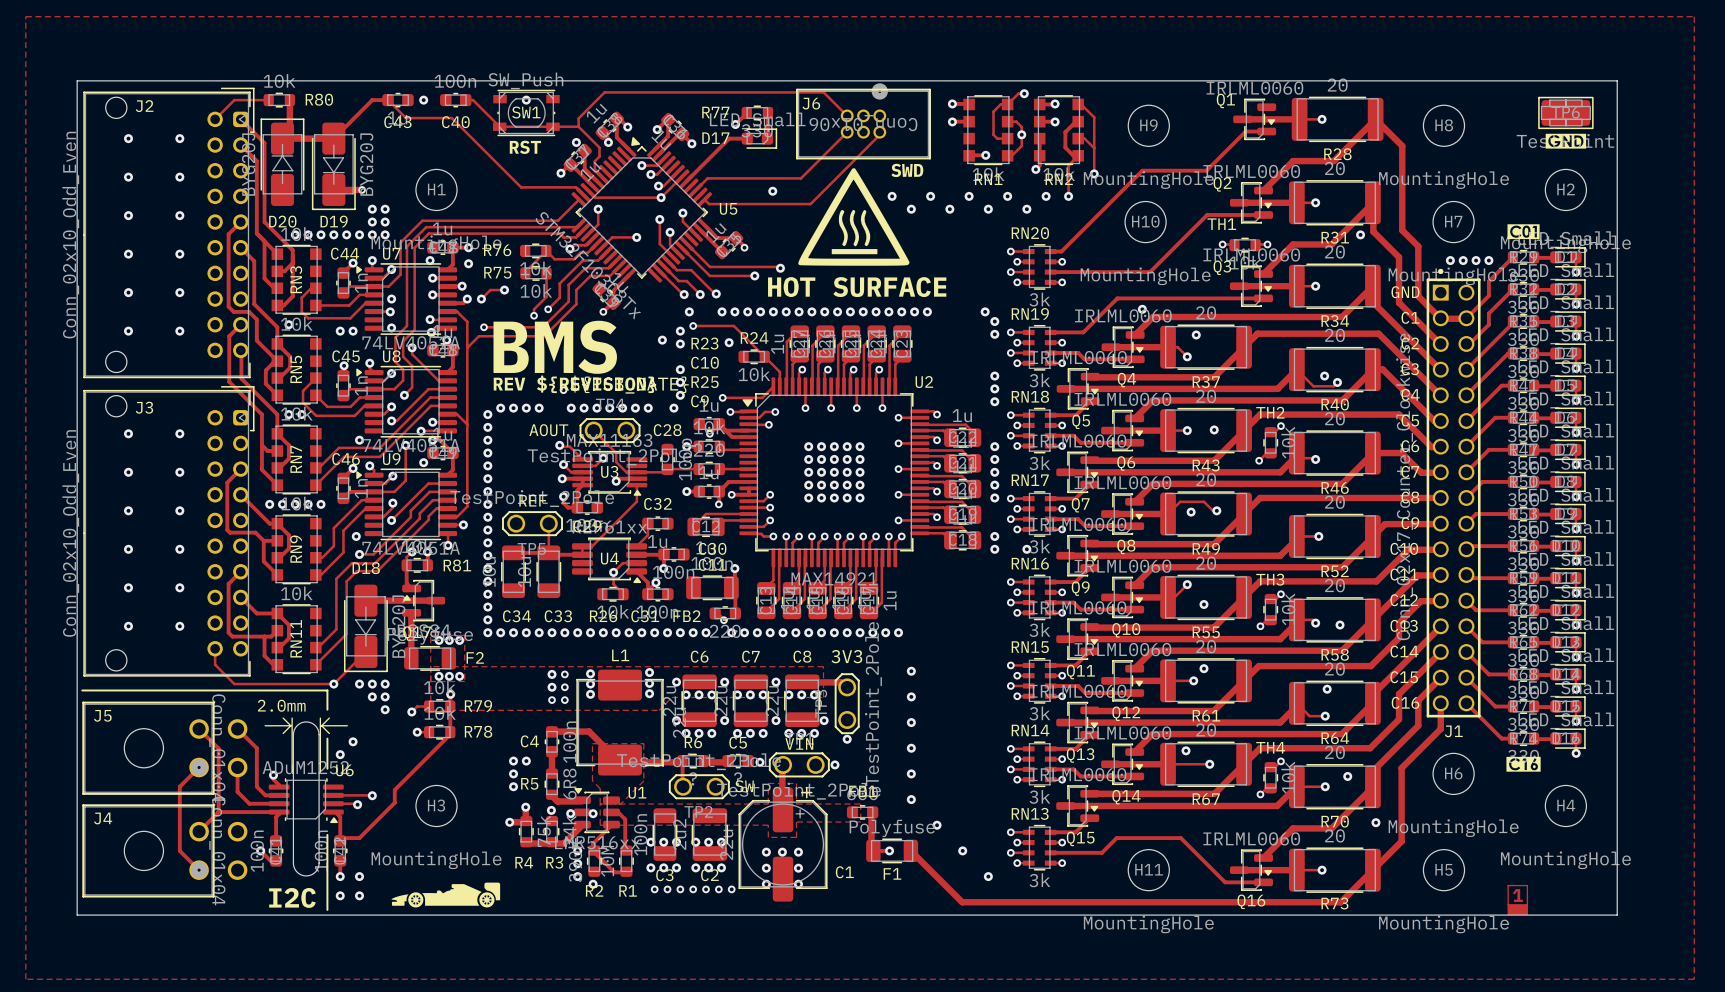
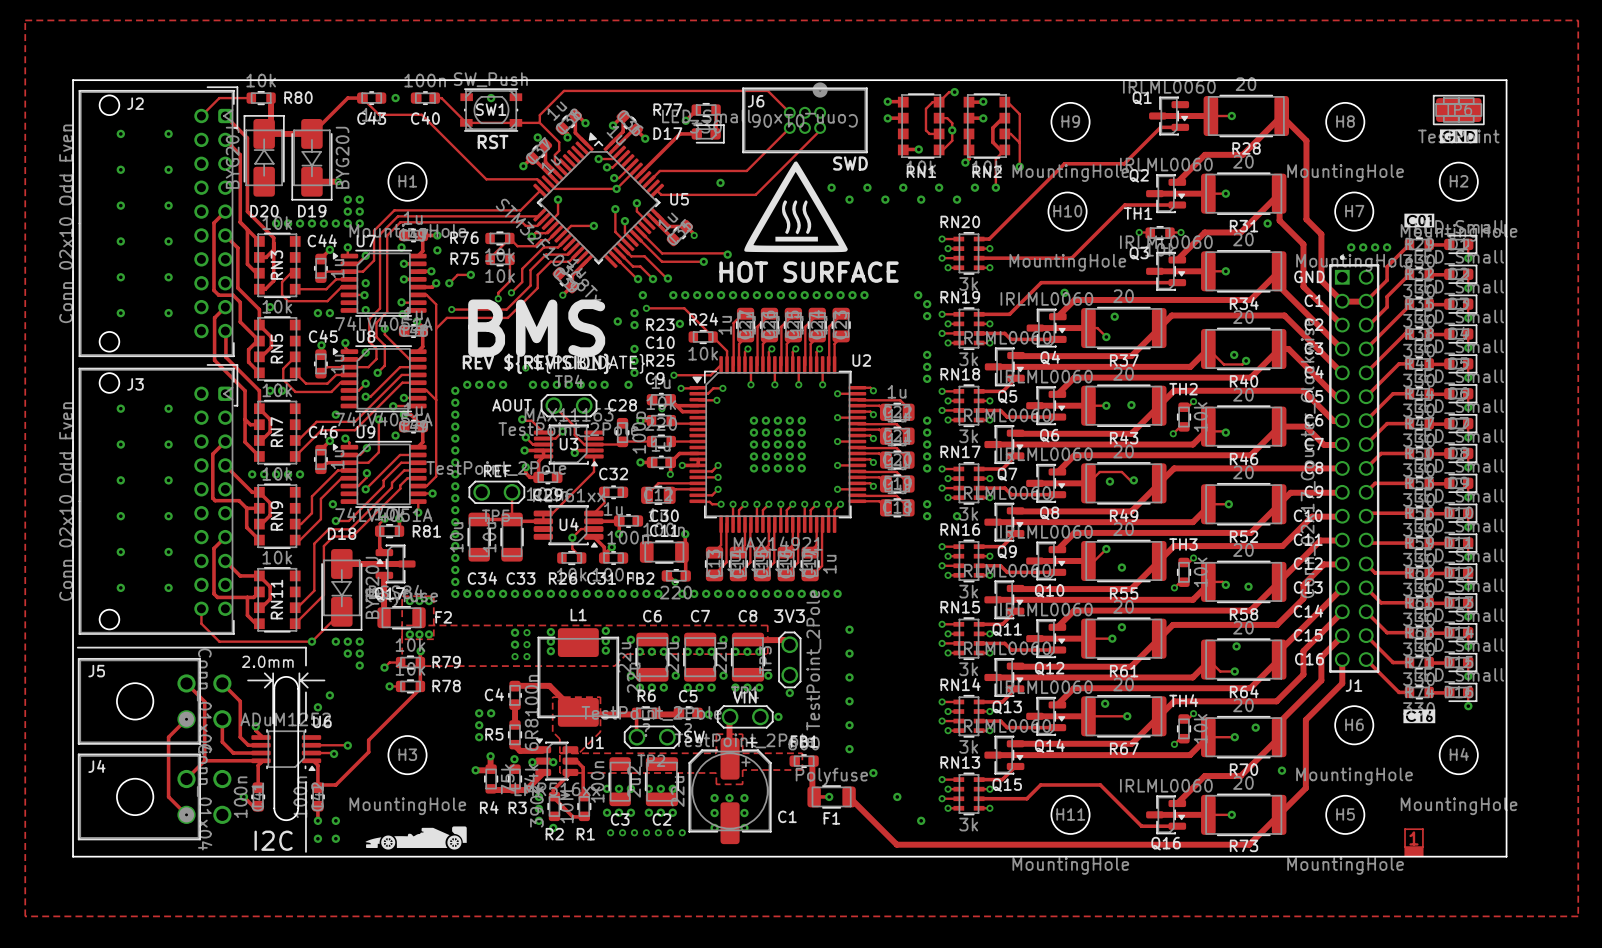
C44 value: 1n (361, 283) -> 1u (337, 268)
C45 value: 1n (361, 386) -> 1u (337, 364)
C46 value: 1n (361, 488) -> 1u (337, 459)

